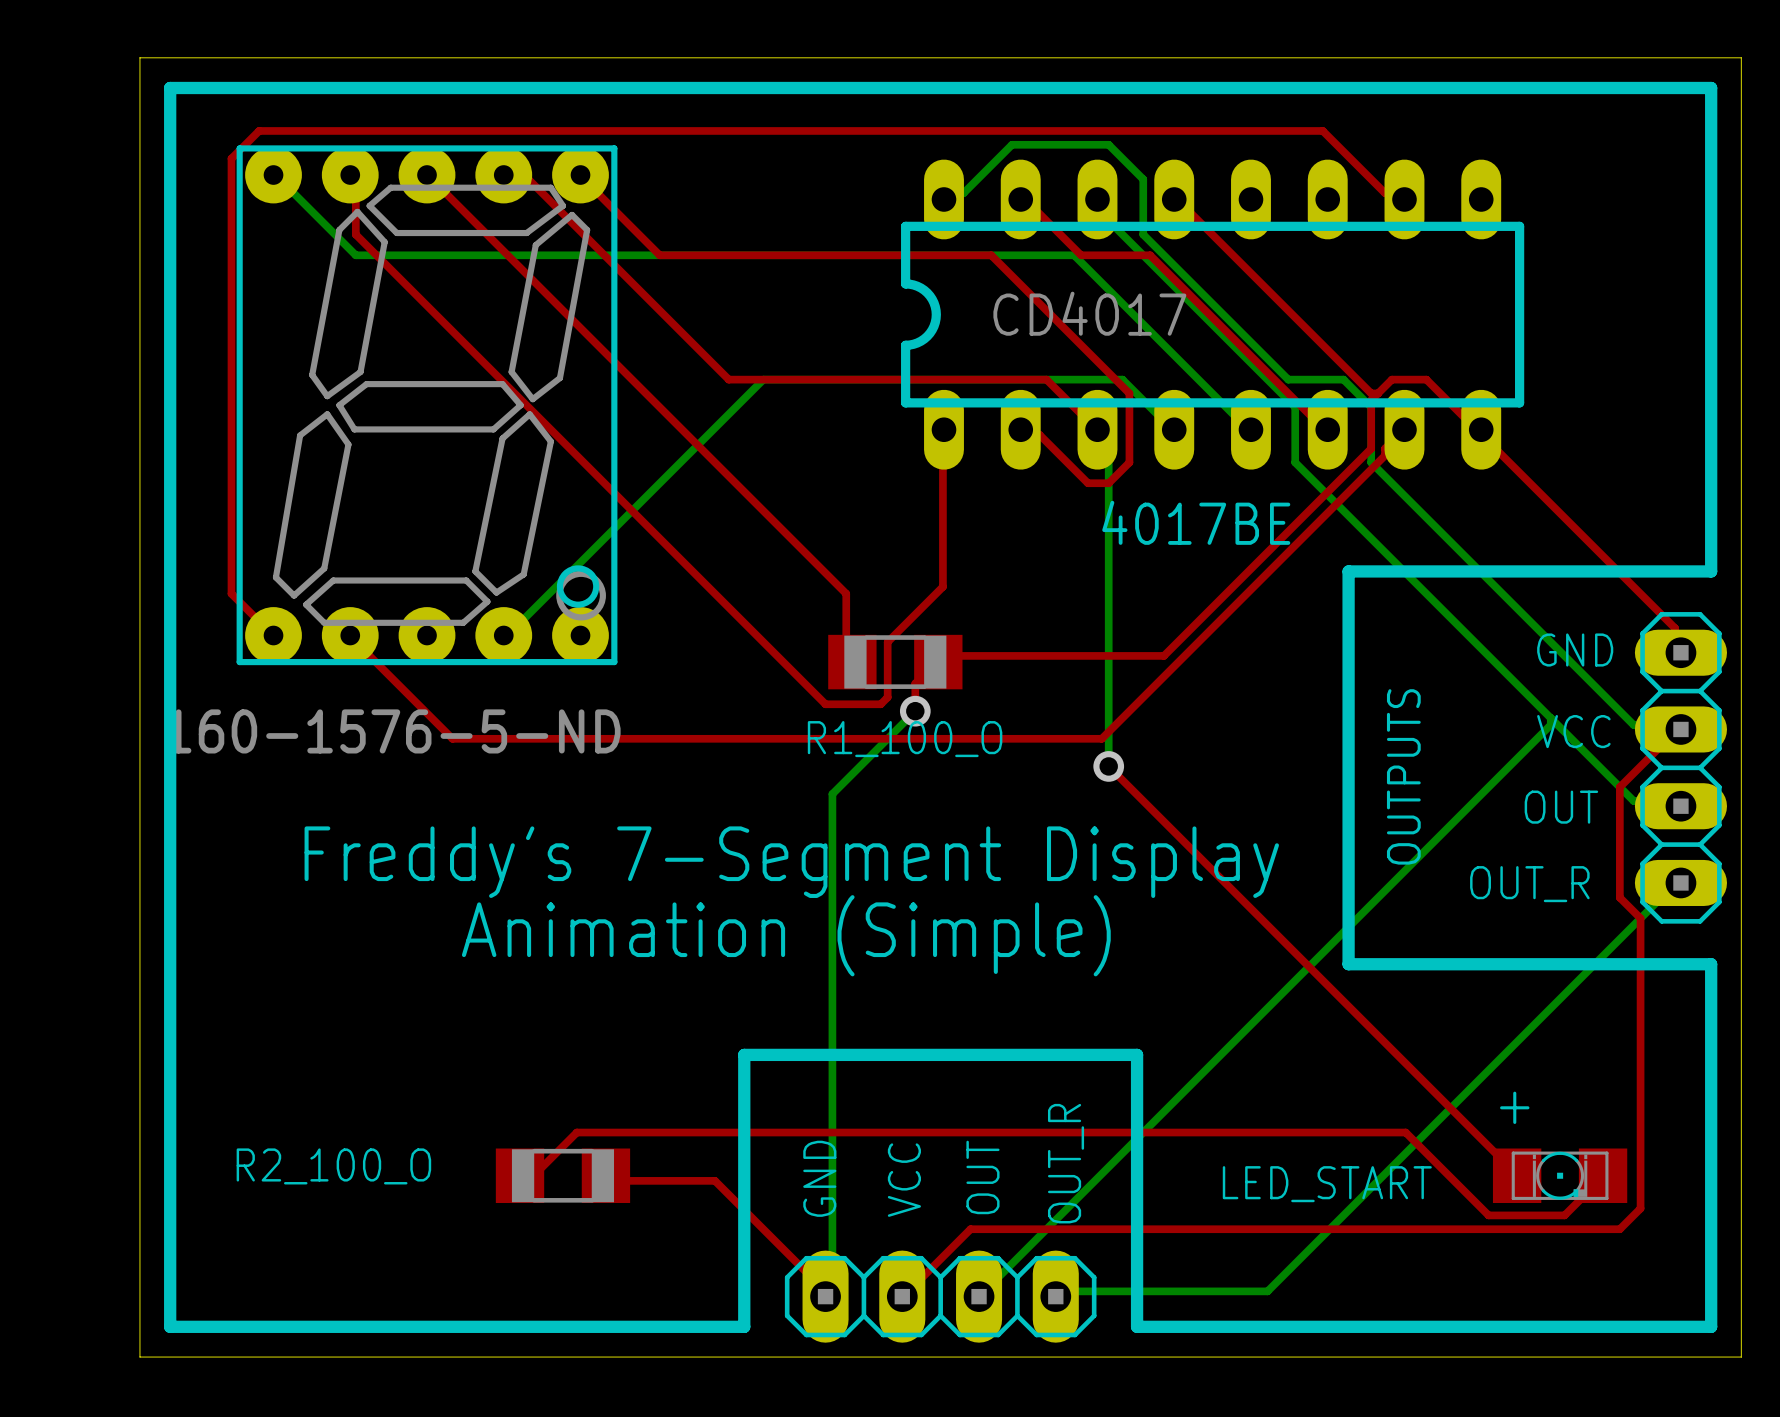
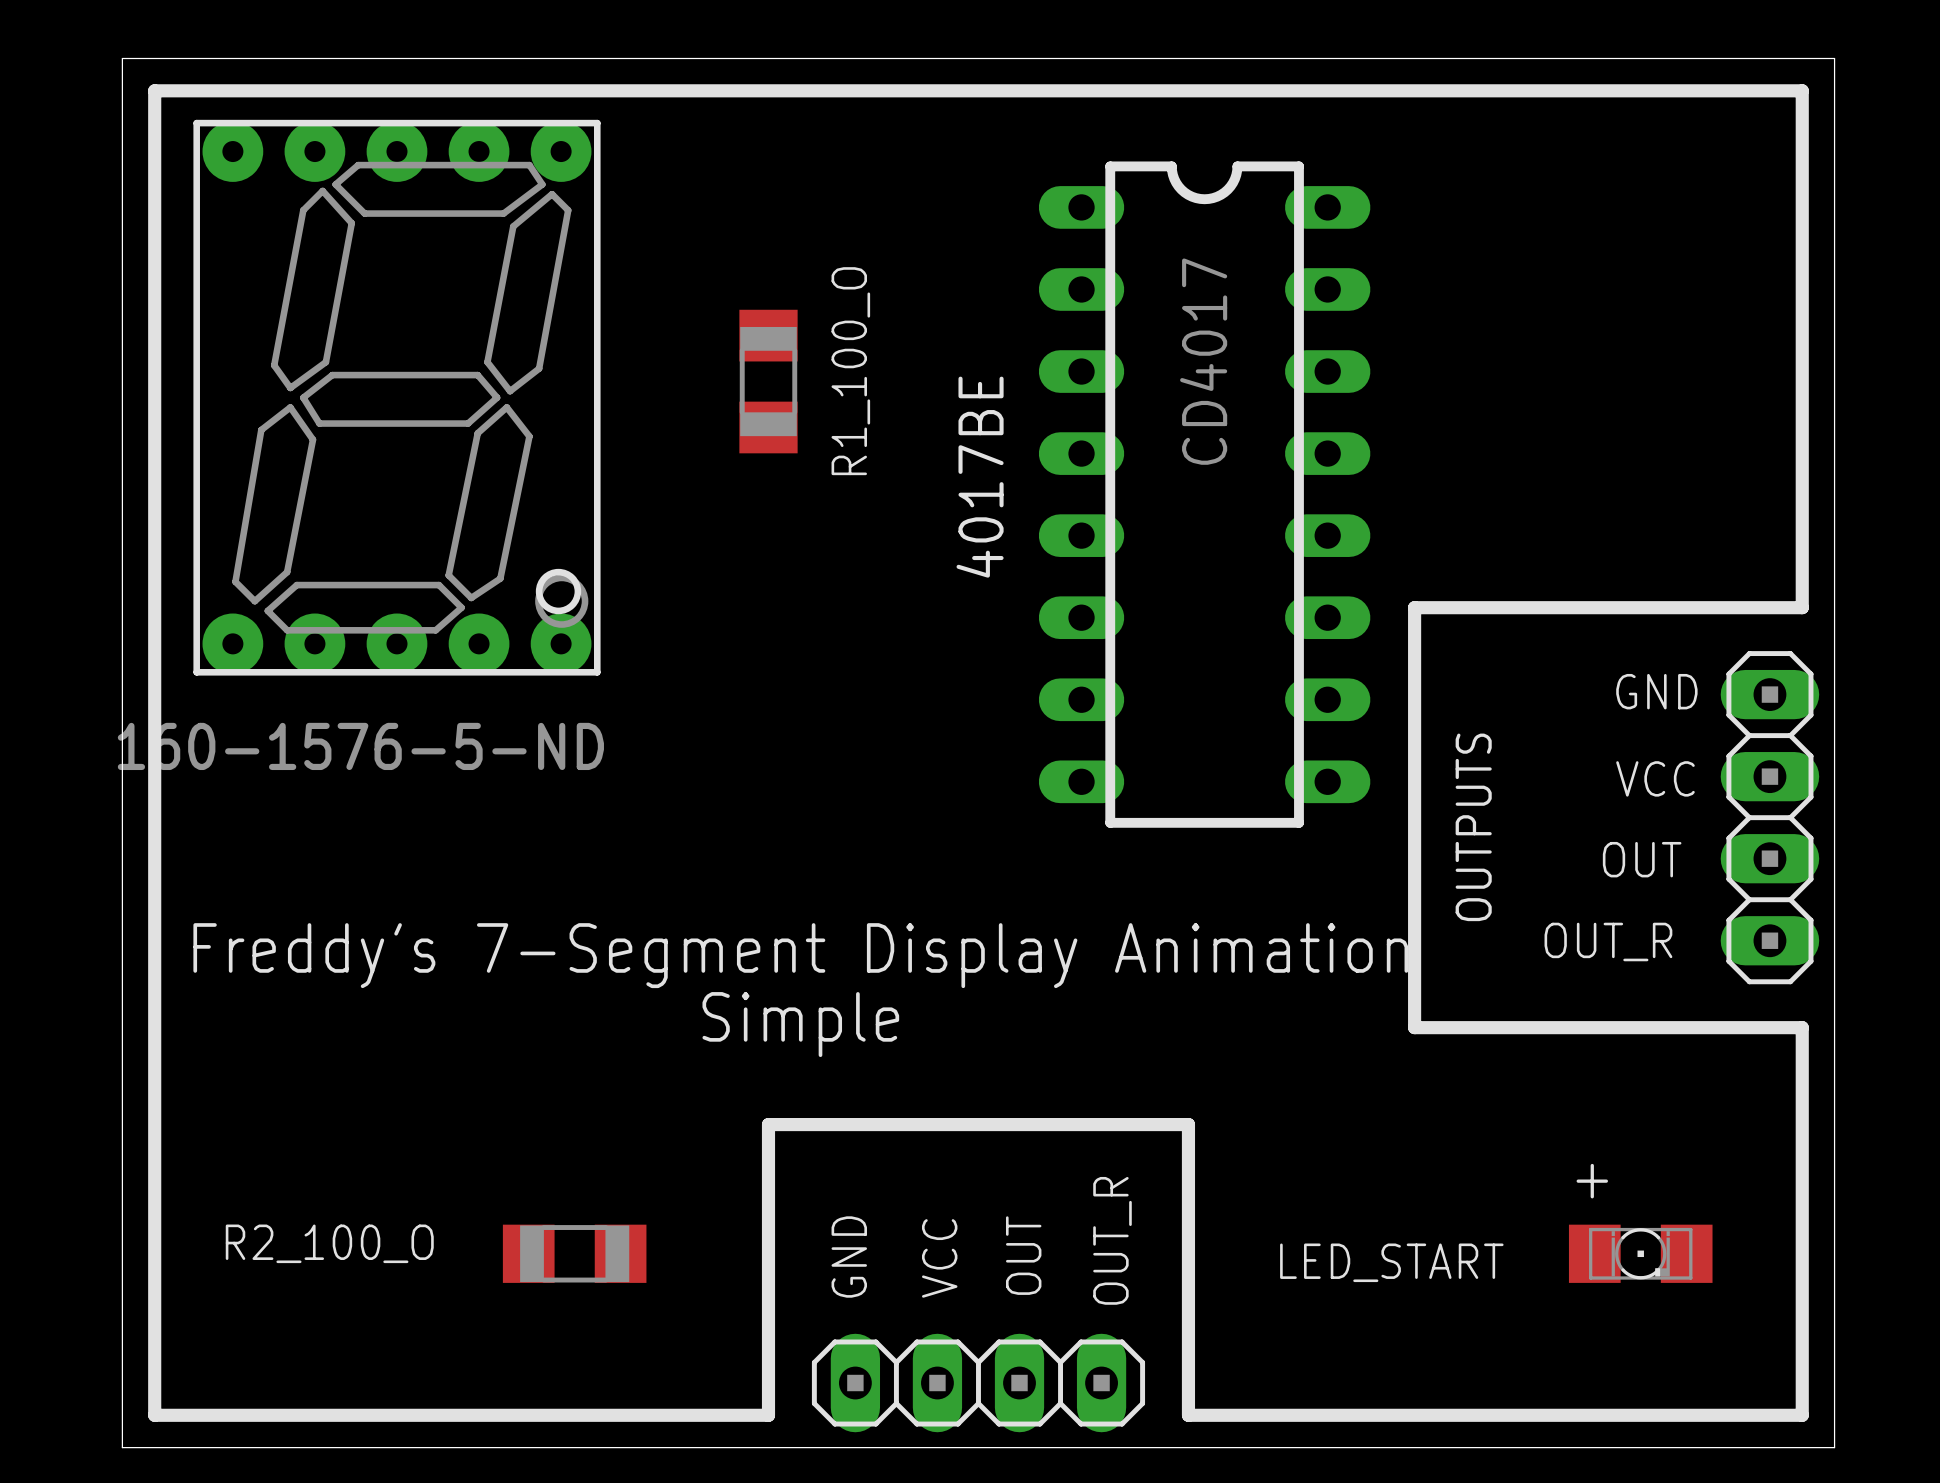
bottom track: (273, 175) (355, 255) (1074, 255) (1246, 427) (1250, 429) -> none
top track: (350, 175) (355, 179) (355, 234) (825, 704) (880, 704) (887, 697) (887, 642) (942, 586) (944, 429) -> none
top track: (427, 175) (846, 593) (846, 655) (852, 662) -> none
top track: (503, 175) (507, 179) (528, 179) (728, 379) (1046, 379) (1097, 429) -> none
top track: (580, 175) (659, 255) (991, 255) (1129, 393) (1129, 462) (1108, 483) (1087, 483) (1039, 434) (1025, 434) (1020, 429) -> none
bottom track: (944, 199) (949, 193) (963, 193) (1012, 144) (1108, 144) (1143, 179) (1143, 234) (1288, 379) (1343, 379) (1371, 407) (1371, 462) (1633, 724) (1675, 724) (1680, 729) -> none
top track: (1020, 199) (1025, 200) (1081, 255) (1150, 255) (1322, 427) (1327, 429) -> none
bottom track: (1097, 199) (1101, 200) (1101, 213) (1295, 407) (1295, 462) (1633, 800) (1675, 800) (1680, 806) -> none
top track: (1174, 199) (1177, 200) (1371, 393) (1378, 393) -> none
top track: (1404, 199) (1398, 193) (1385, 193) (1322, 130) (259, 130) (231, 158) (231, 593) (273, 635) -> none
4017BE rotation: 0° (1212, 314) -> 90° clockwise (1204, 494)
part position: (427, 405) -> (396, 397)
bottom track: (1097, 429) (1108, 441) (1108, 766) -> none
bottom track: (1174, 429) (1122, 379) (763, 379) (507, 635) (503, 635) -> none
top track: (1404, 429) (1385, 448) (1385, 455) (1101, 738) (452, 738) (350, 635) -> none
top track: (1680, 652) (1675, 649) (1675, 628) (1481, 434) (1481, 429) (1474, 427) (1426, 379) (1391, 379) (1371, 400) (1371, 448) (1163, 655) (942, 655) (915, 683) (915, 711) -> none
R1_100_O rotation: 0° (895, 662) -> 90° clockwise (768, 381)
R1_100_O position: (895, 662) -> (768, 381)
bottom track: (915, 711) (832, 794) (832, 1291) (825, 1296) -> none
via: (915, 711) -> none
bottom track: (1550, 718) (1550, 724) (979, 1296) -> none
top track: (1680, 729) (1675, 731) (1619, 787) (1619, 897) (1640, 918) (1640, 1208) (1619, 1229) (970, 1229) (902, 1296) -> none
R1_100_O name position: R1_100_O (905, 739) -> R1_100_O (850, 371)
top track: (1108, 766) (1517, 1175) -> none
via: (1108, 766) -> none
text: Freddy's 7-Segment Display (791, 862) -> Freddy's 7-Segment Display Animation (800, 955)
bottom track: (1680, 882) (1675, 883) (1267, 1291) (1060, 1291) (1055, 1296) -> none
text: Animation (Simple) (786, 935) -> none
text: none -> Simple (800, 1024)
top track: (520, 1175) (521, 1173) (535, 1173) (576, 1132) (1405, 1132) (1488, 1215) (1564, 1215) (1603, 1175) -> none
top track: (605, 1175) (611, 1180) (715, 1180) (825, 1291) (825, 1296) -> none

